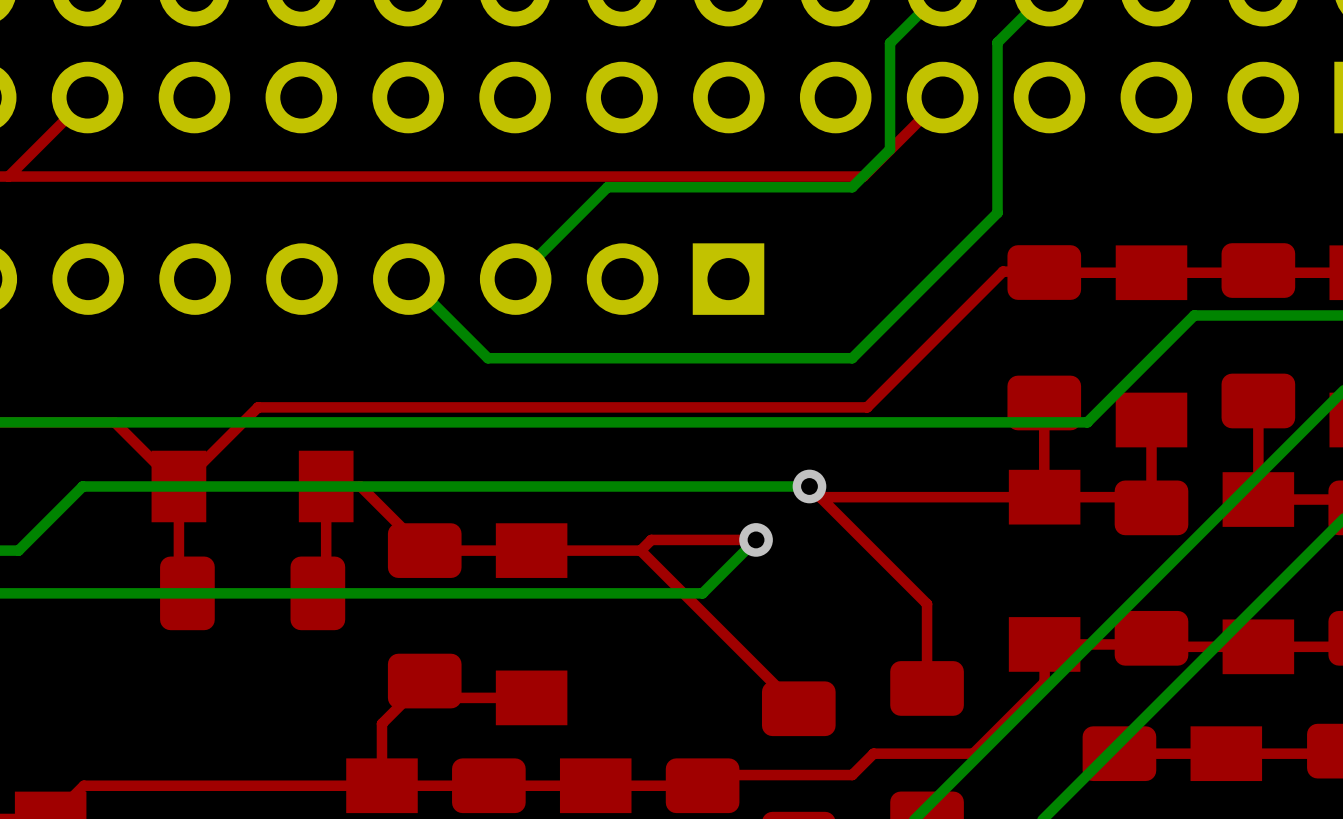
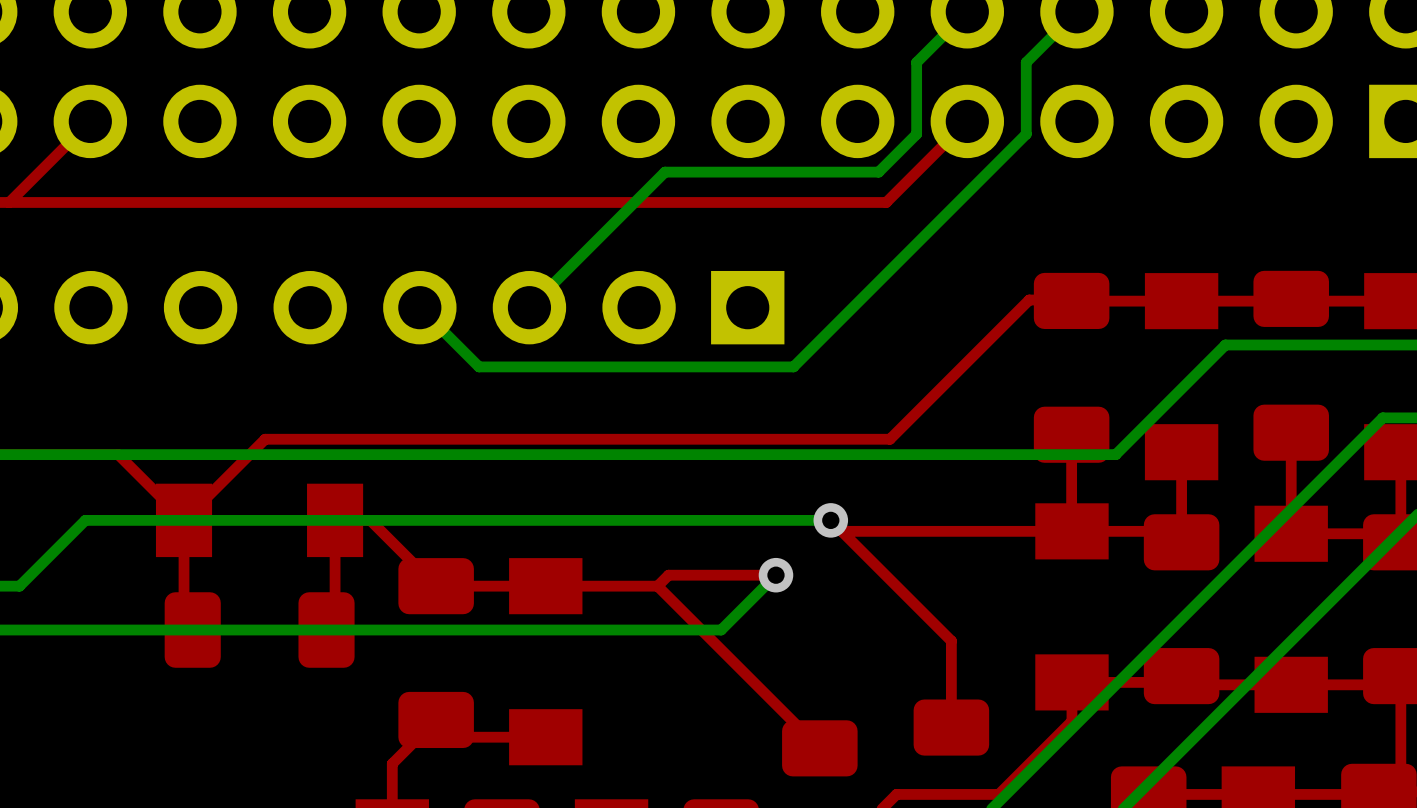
bottom track: (893, 40) (890, 43) (890, 149) (852, 187) (607, 187) -> (916, 62) (916, 134) (878, 172) (664, 172) (623, 213)
bottom track: (1000, 40) (997, 42) (997, 212) (852, 358) (487, 358) (466, 336) -> (1026, 62) (1026, 134) (793, 366) (479, 366)

